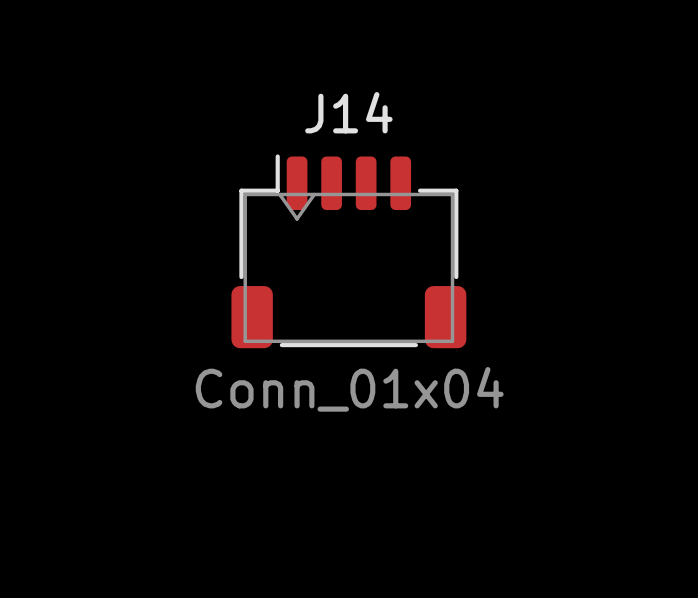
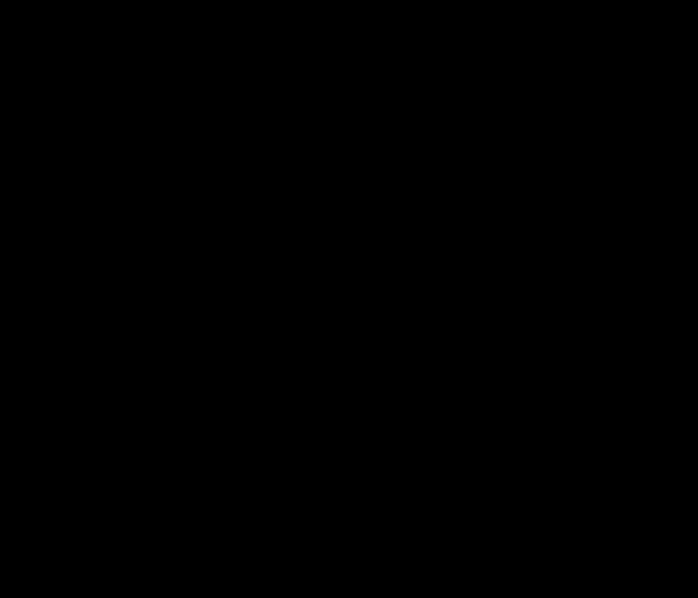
J14: Conn_01x04 (348, 251) -> none

